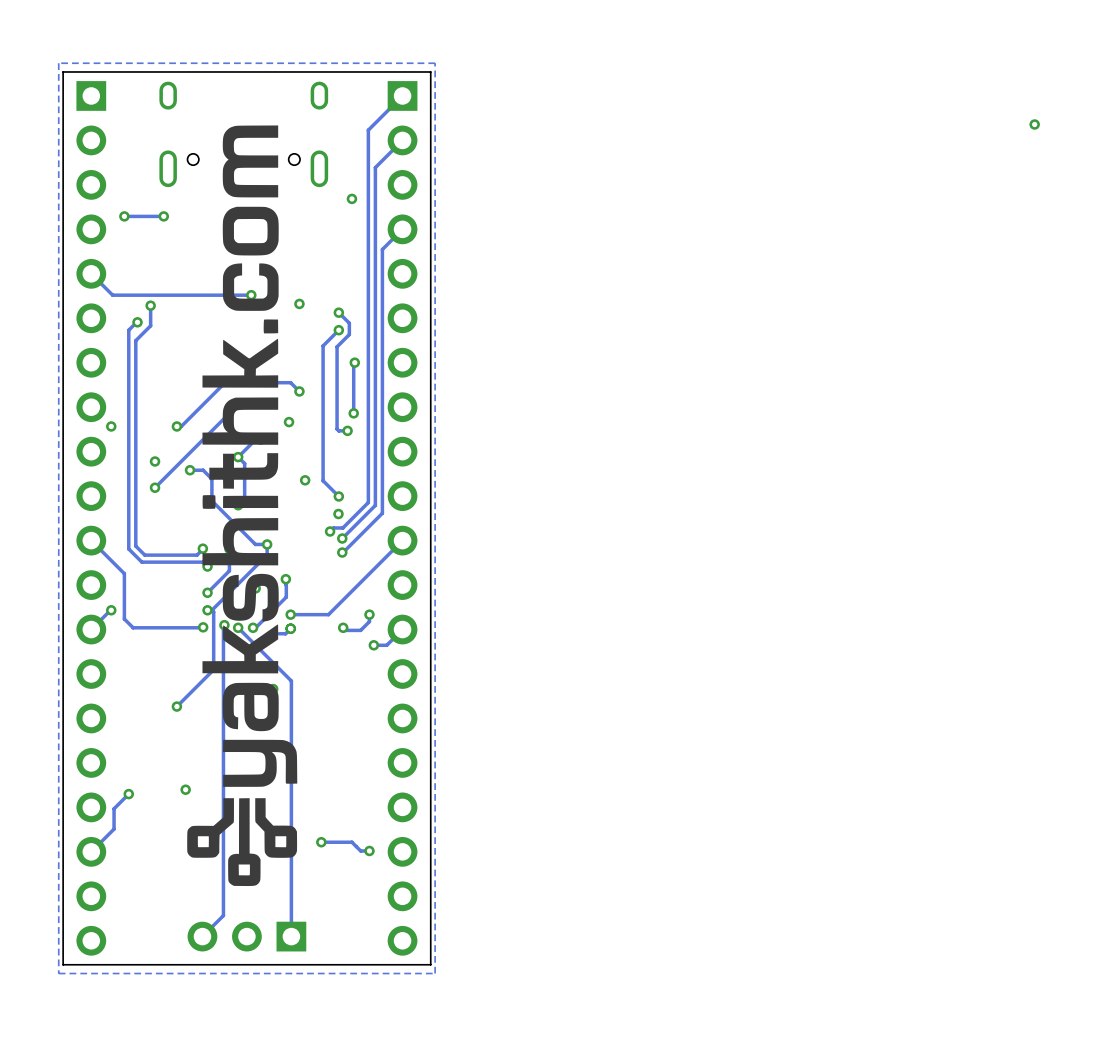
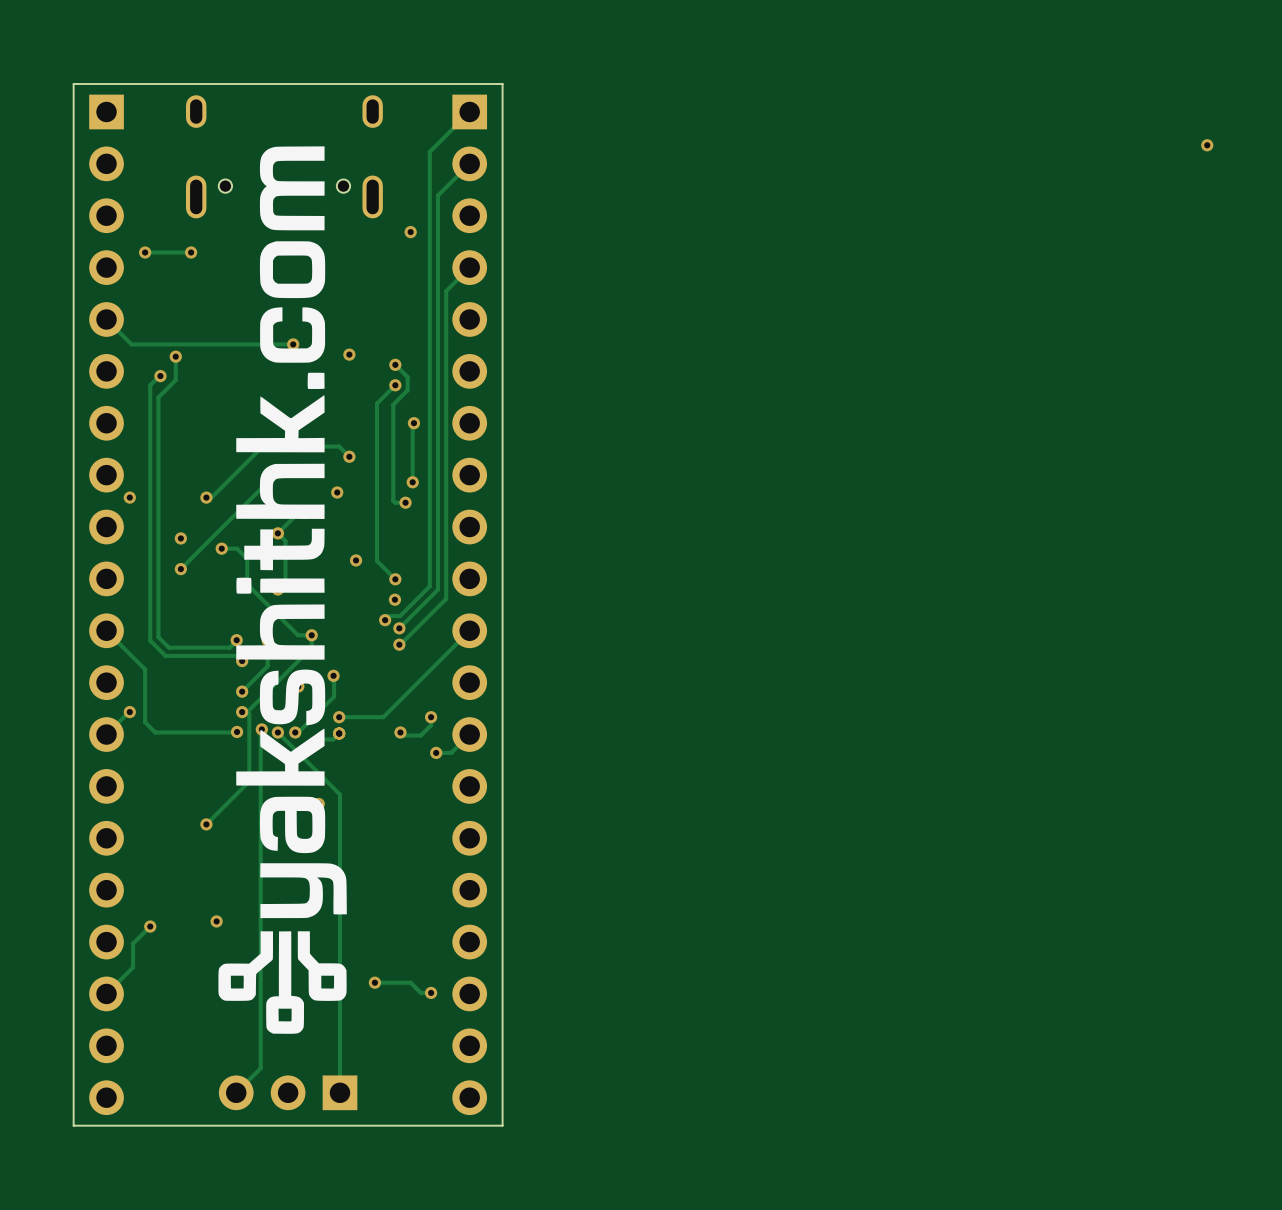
zone outline: (435, 63) (58, 63) (58, 973) (435, 973) (435, 63) -> none

